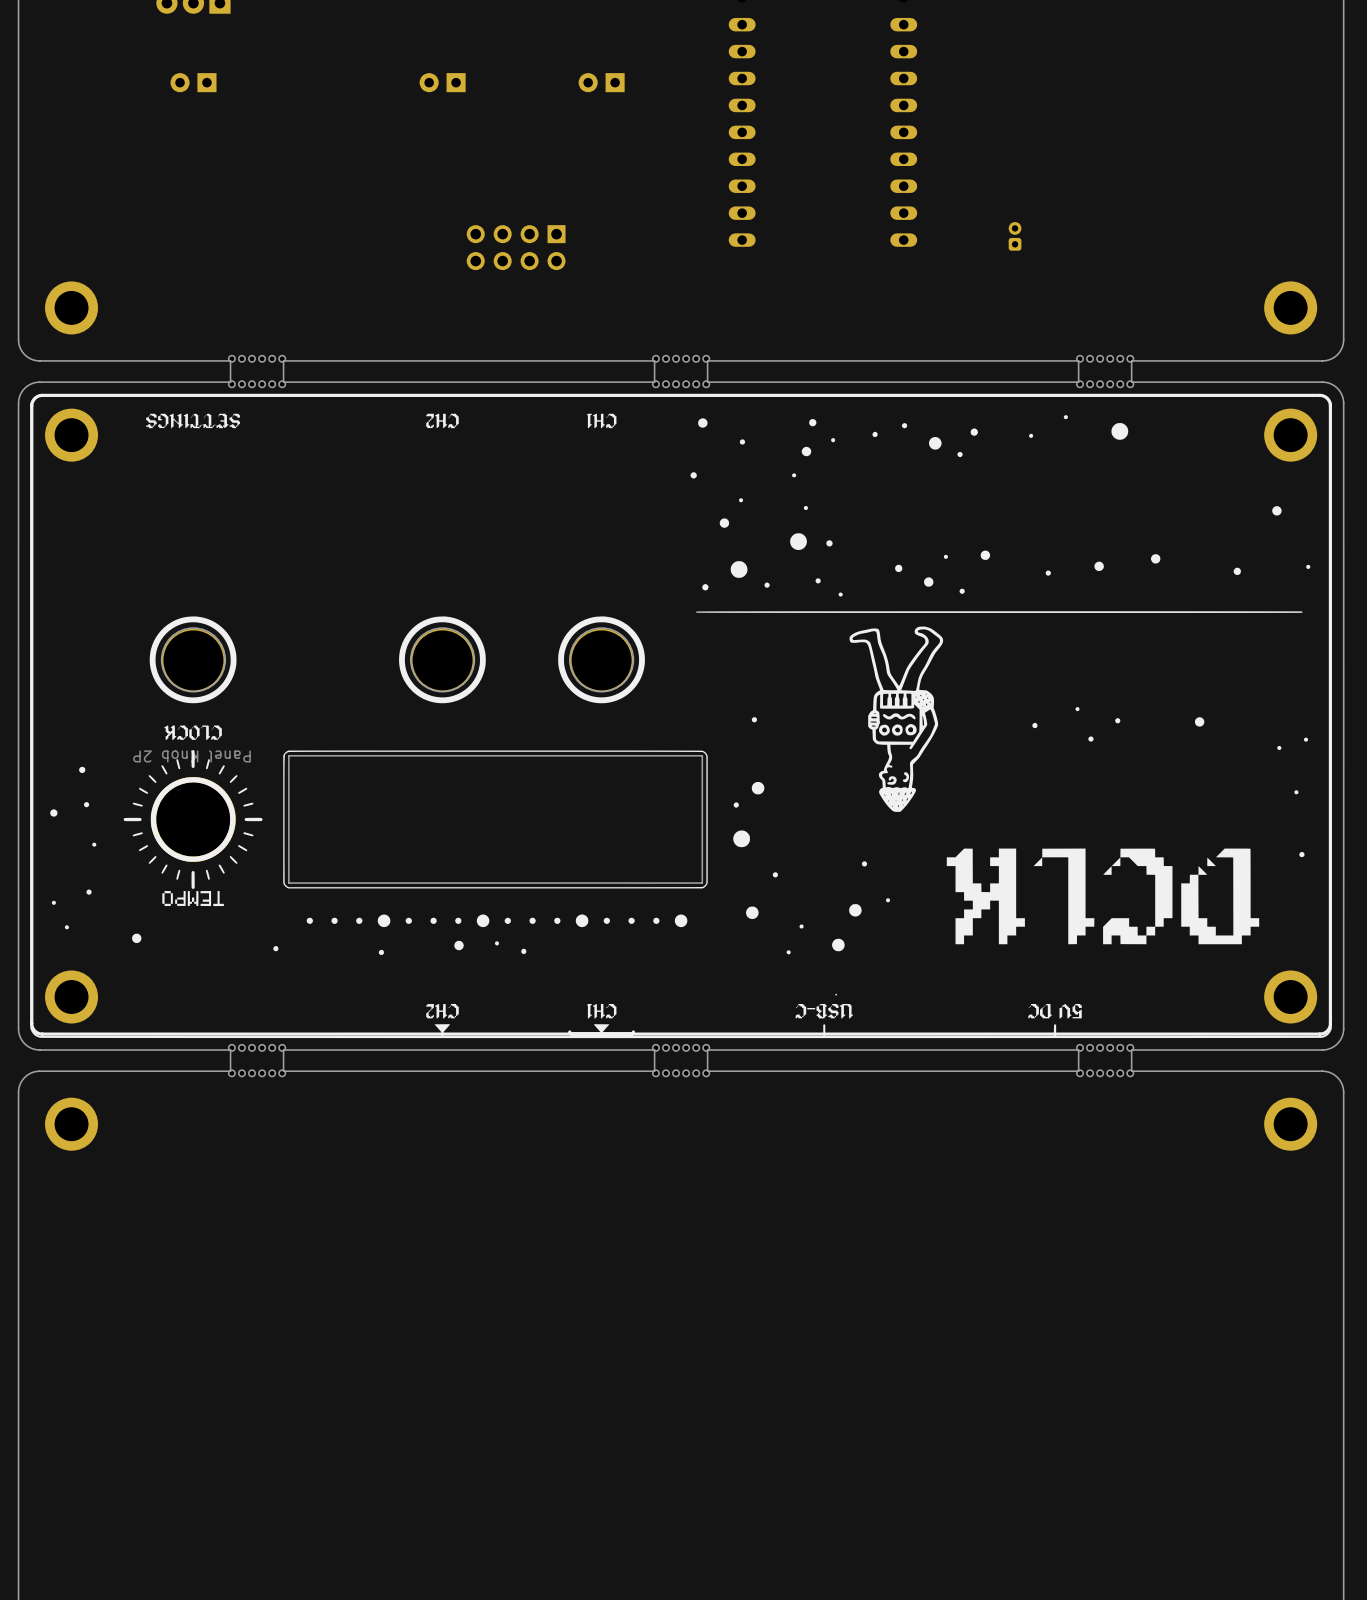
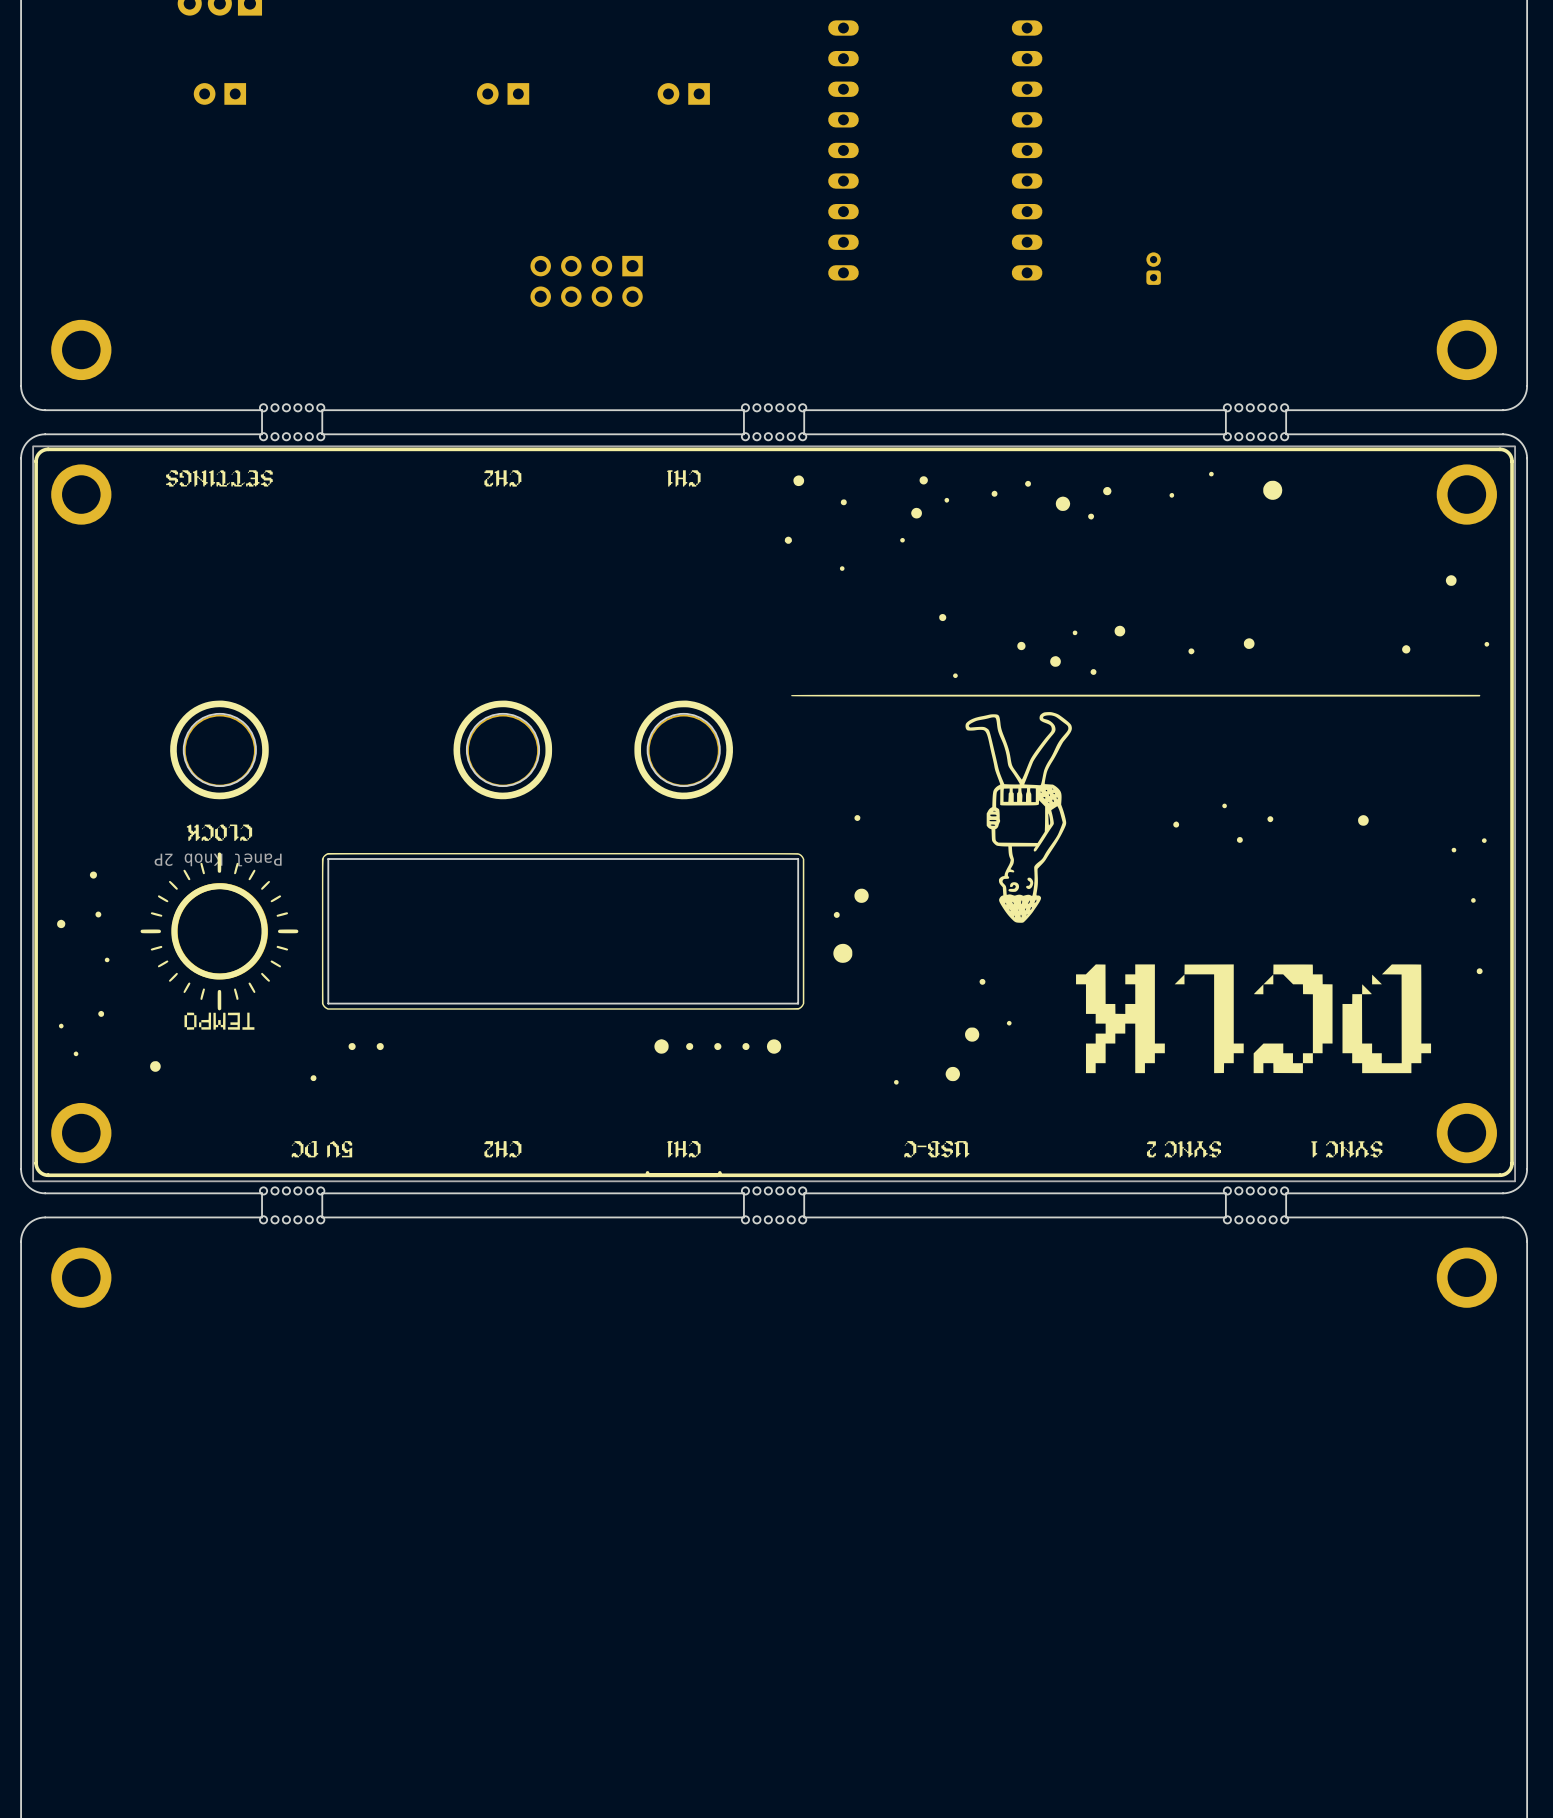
drawing: none -> [20, 445, 1528, 1182]
drawing: [17, 394, 1345, 1039] -> none

